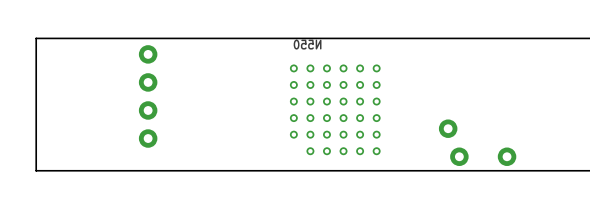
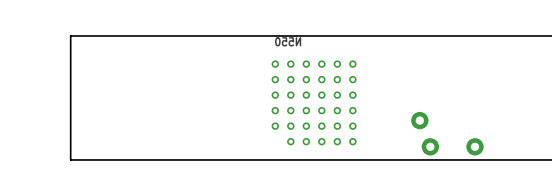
board edge: (75, 38) (36, 38) (36, 170) (75, 170) -> (70, 35) (70, 159)
part: (148, 54) -> none
part: (148, 82) -> none
part: (148, 110) -> none
part: (148, 138) -> none

